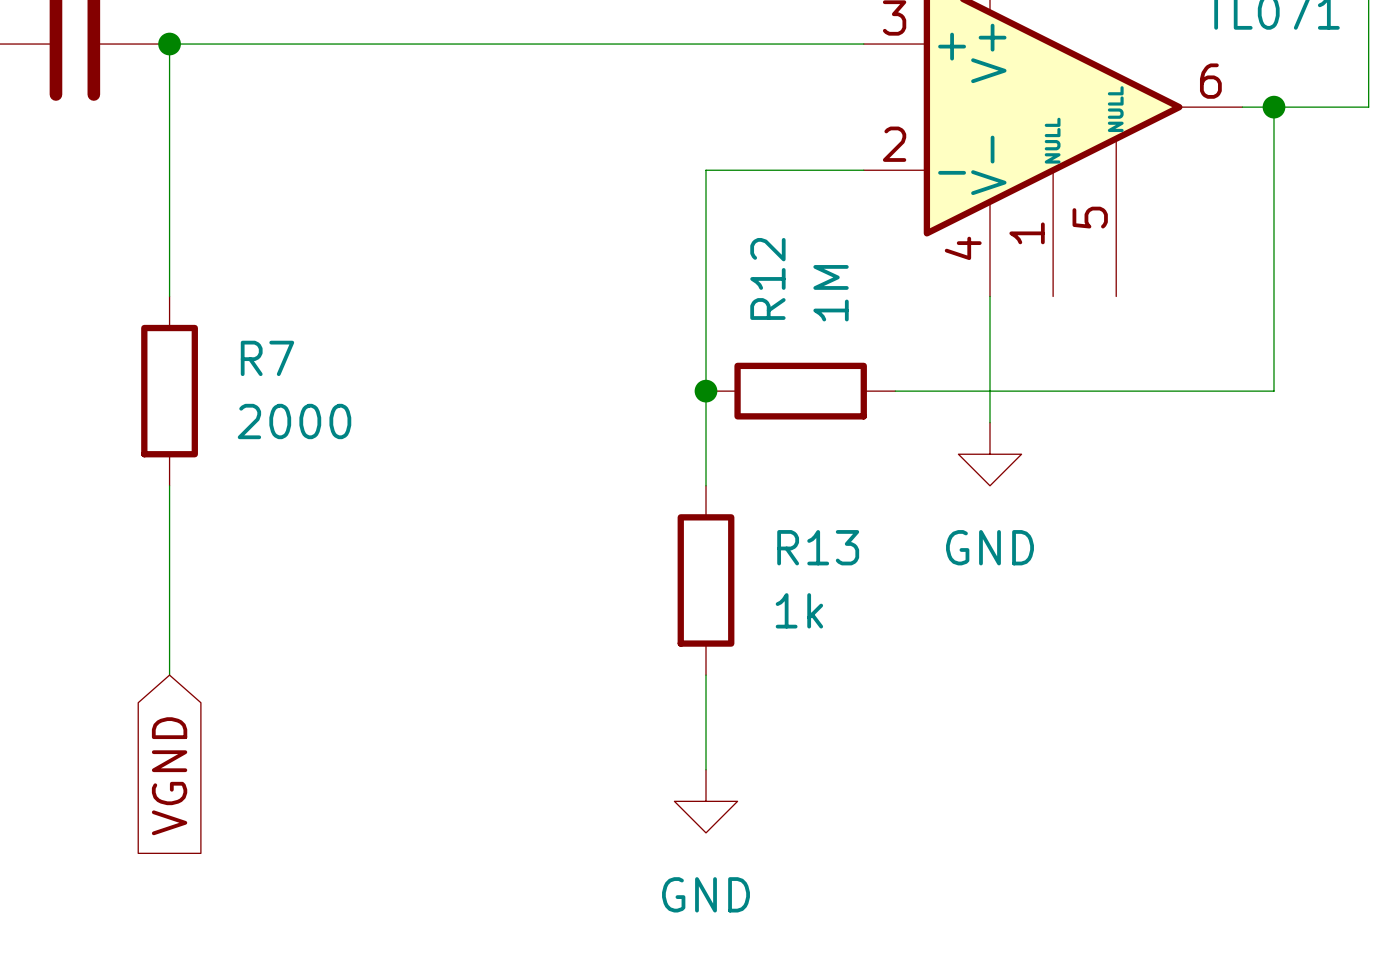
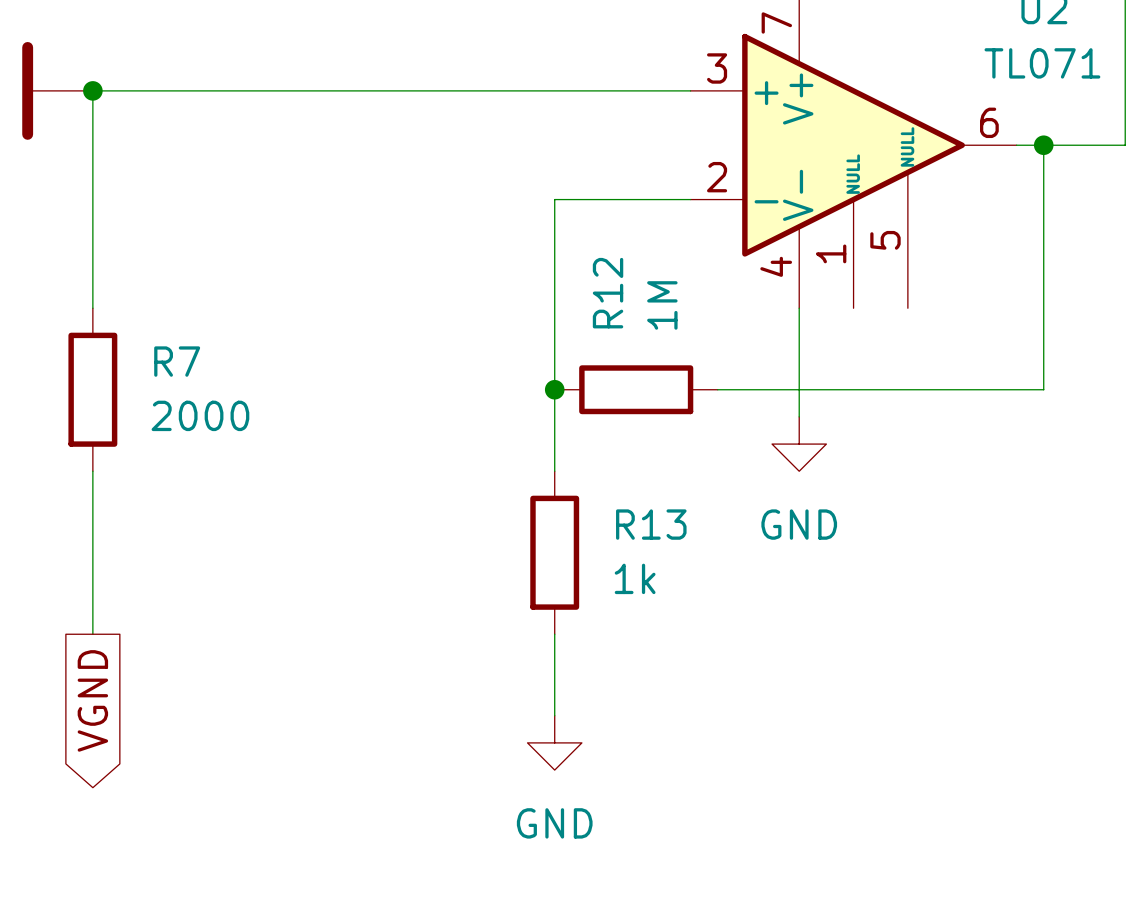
global label shape: input (169, 776) -> output (92, 700)

